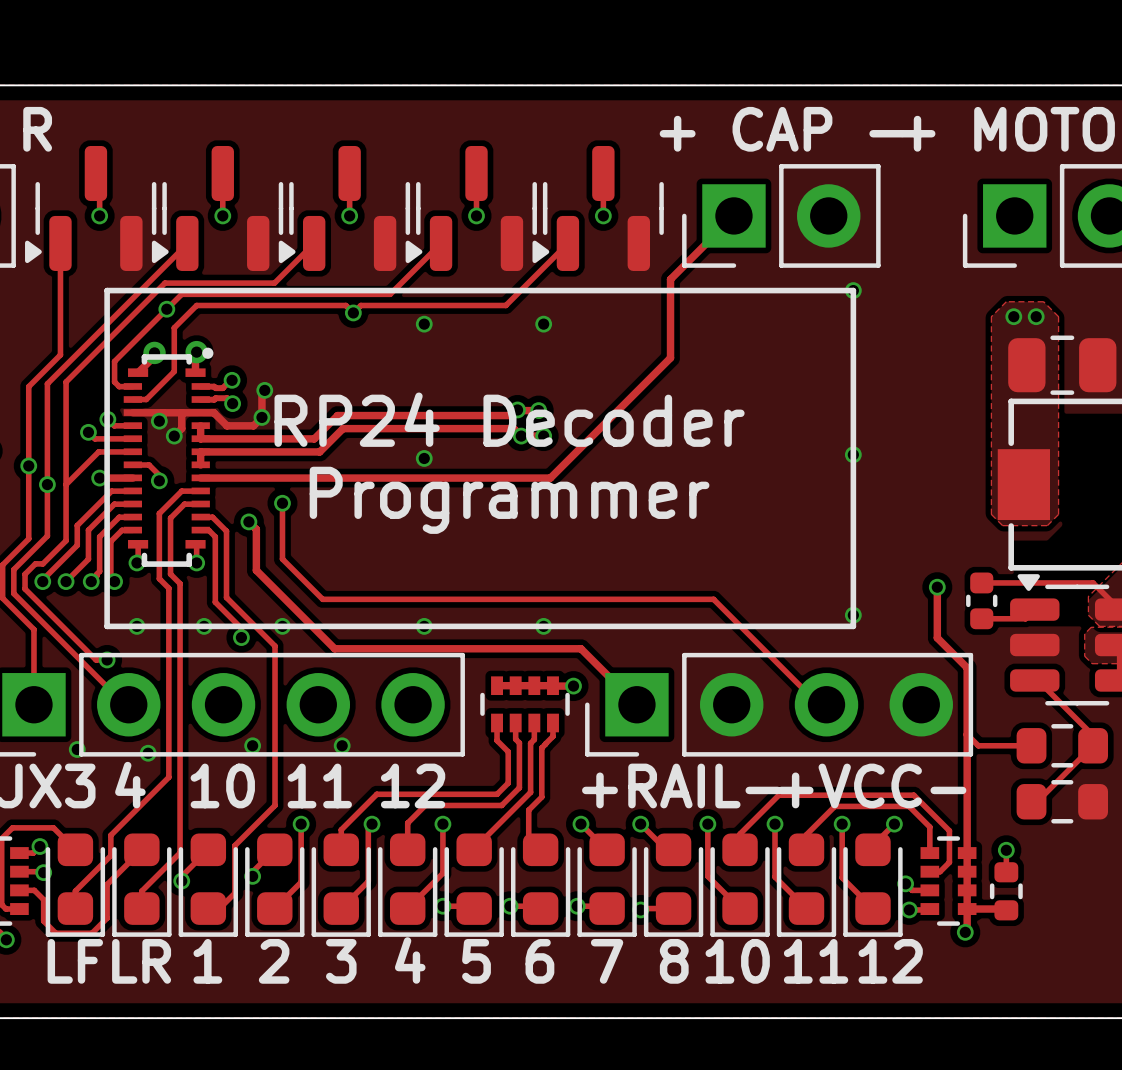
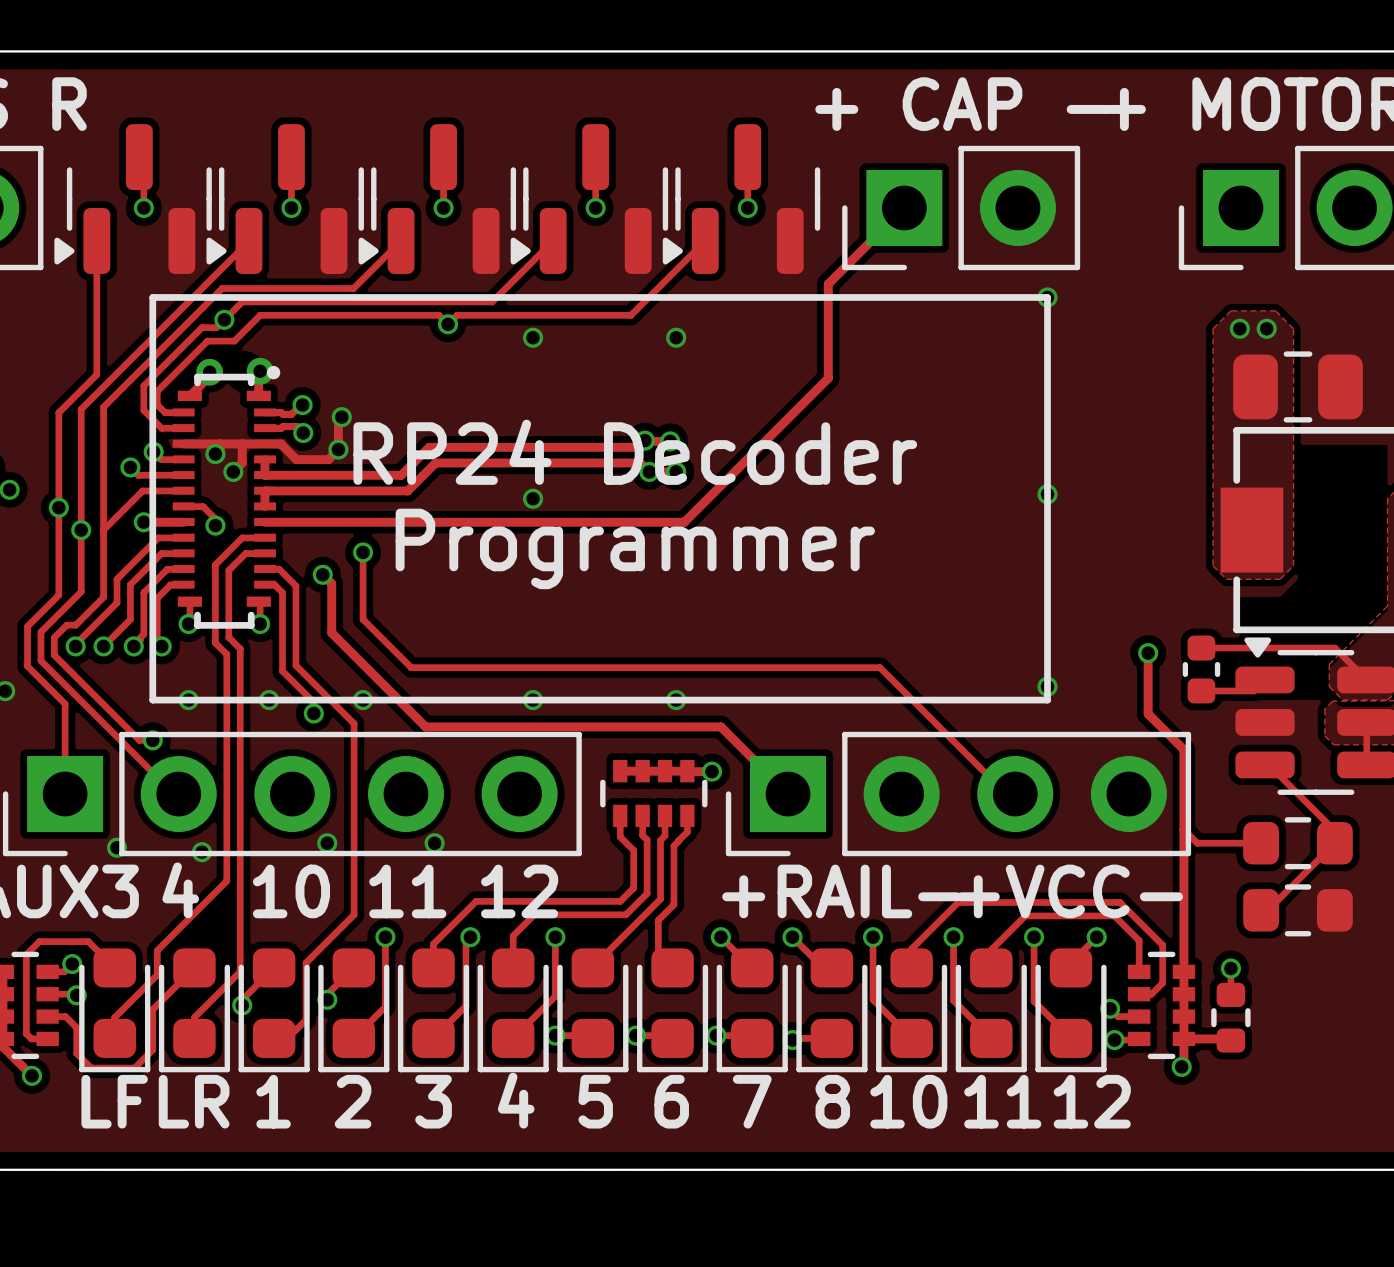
track: (160, 315) (114, 361) (114, 381) (119, 386) -> (234, 341) (207, 341) (157, 391) (157, 404) (167, 412)
track: (175, 326) (174, 371) (146, 399) (132, 399) -> (216, 327) (202, 327) (143, 385) (143, 410) (161, 428) (183, 428)

